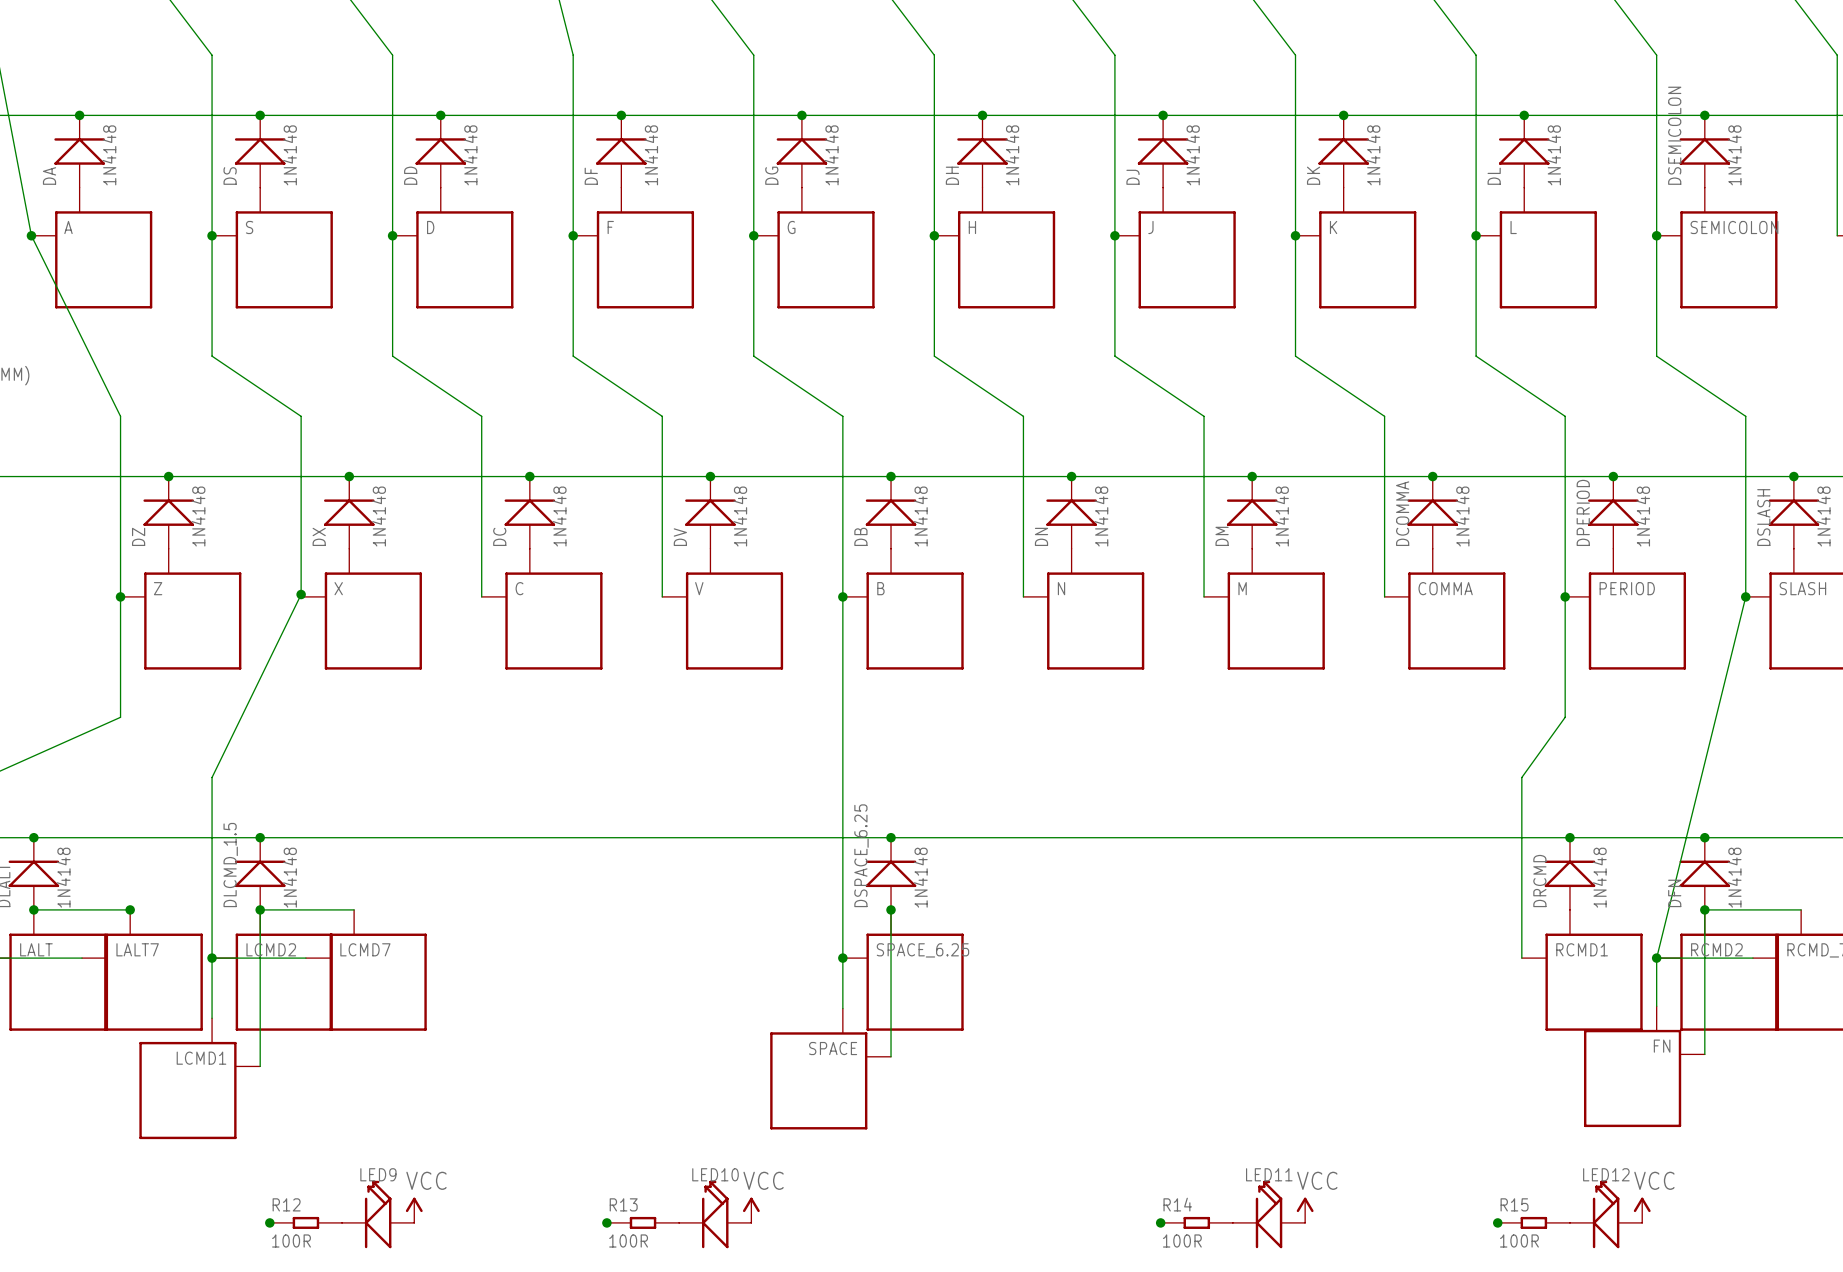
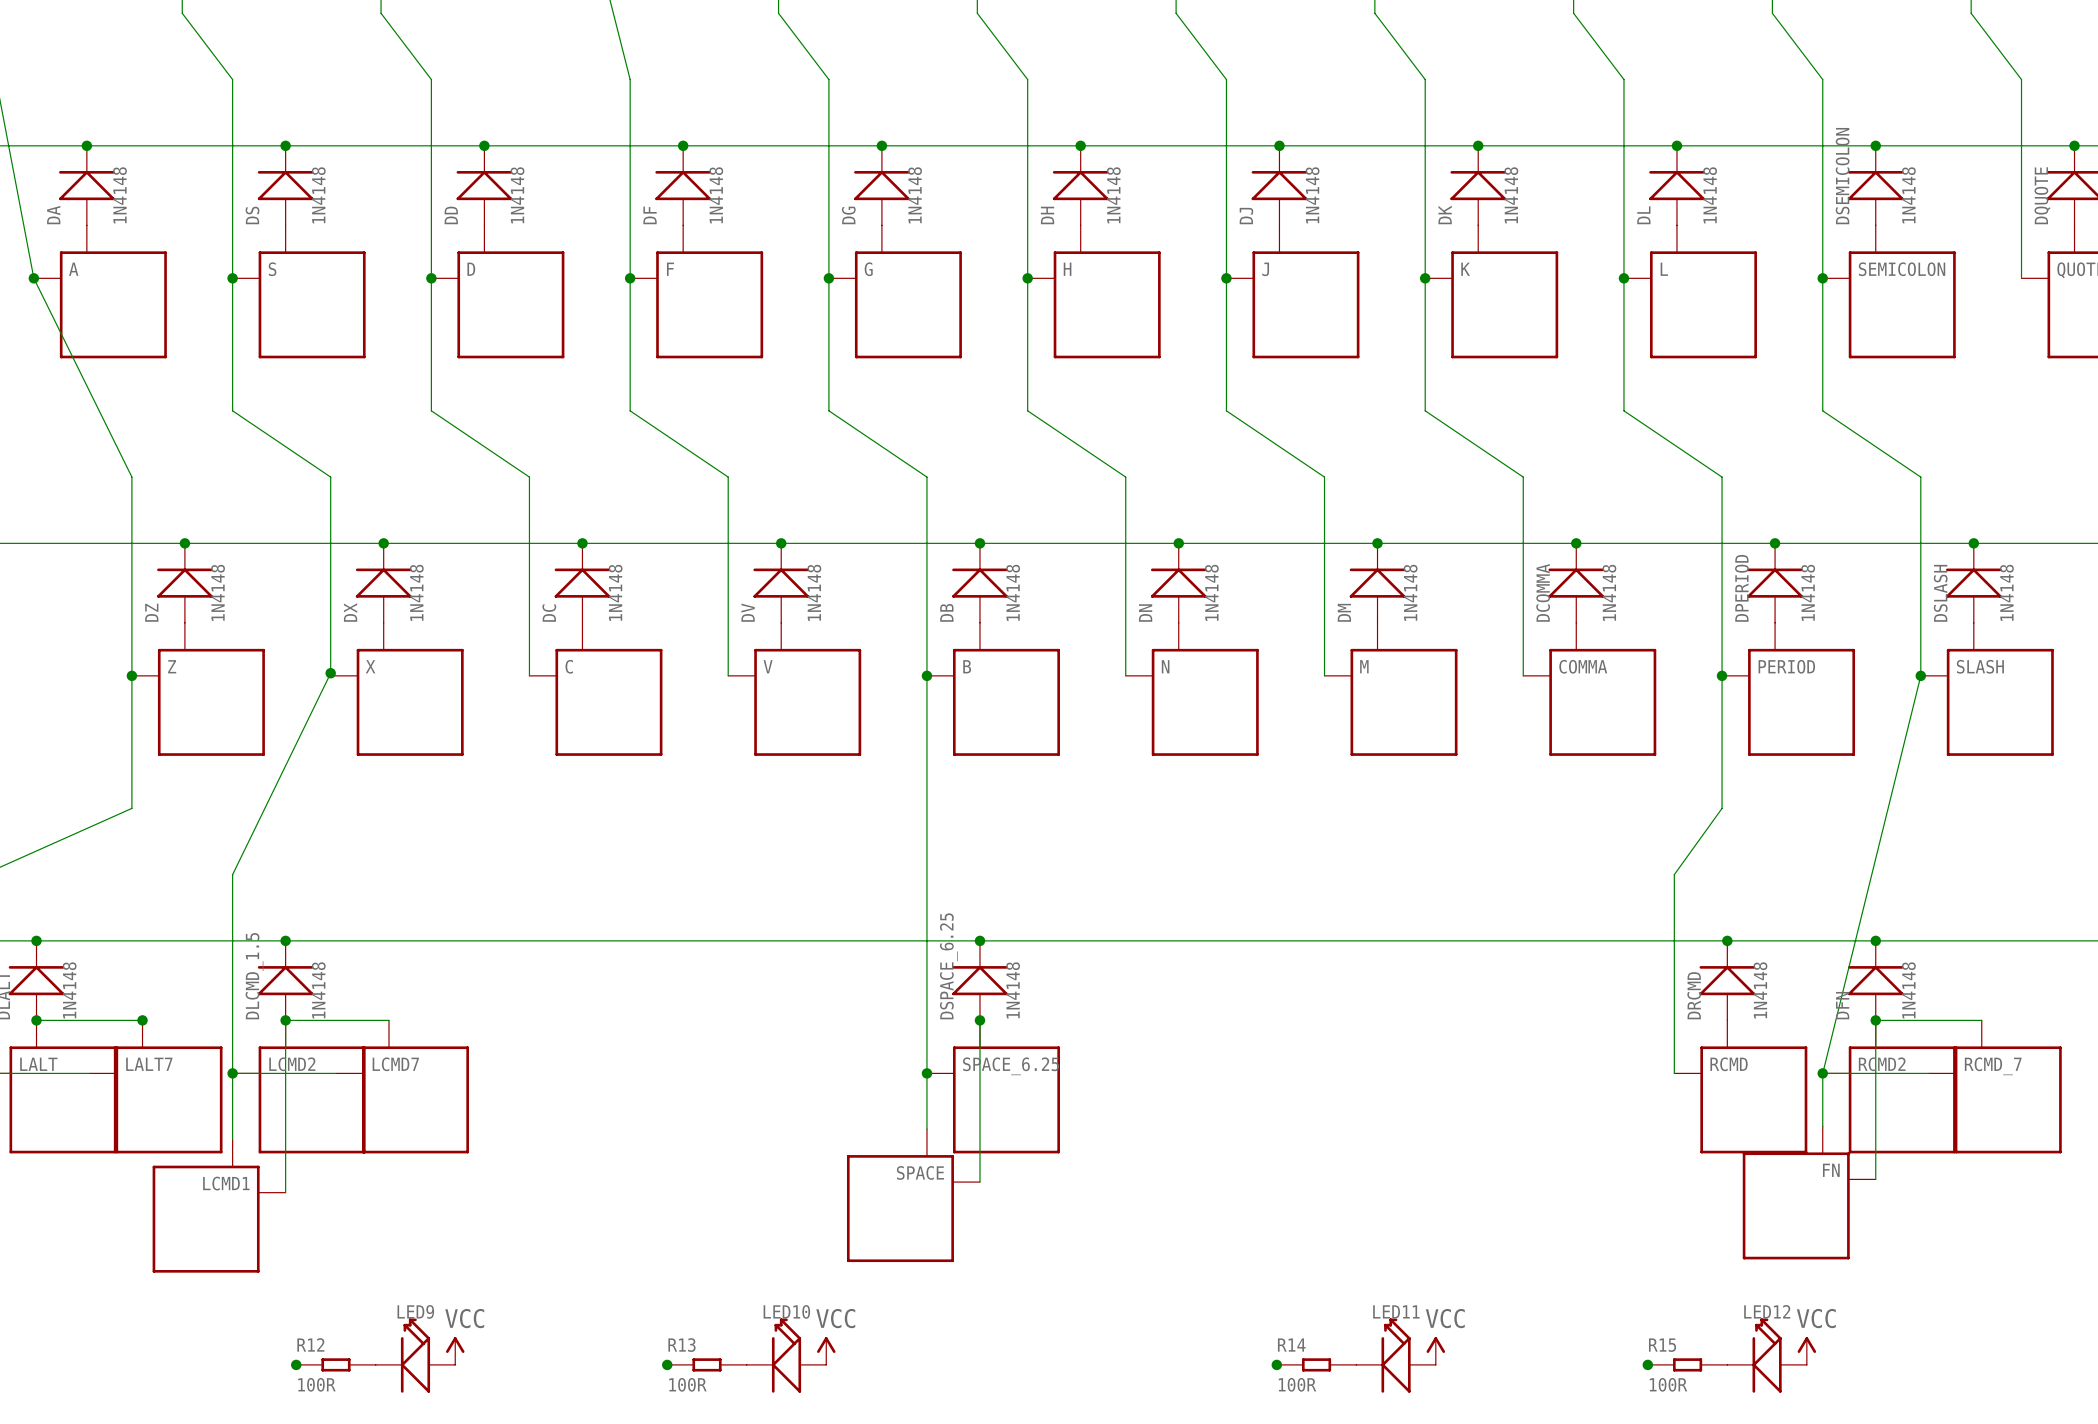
RCMD1 name: RCMD1 (1582, 949) -> RCMD (1729, 1064)

